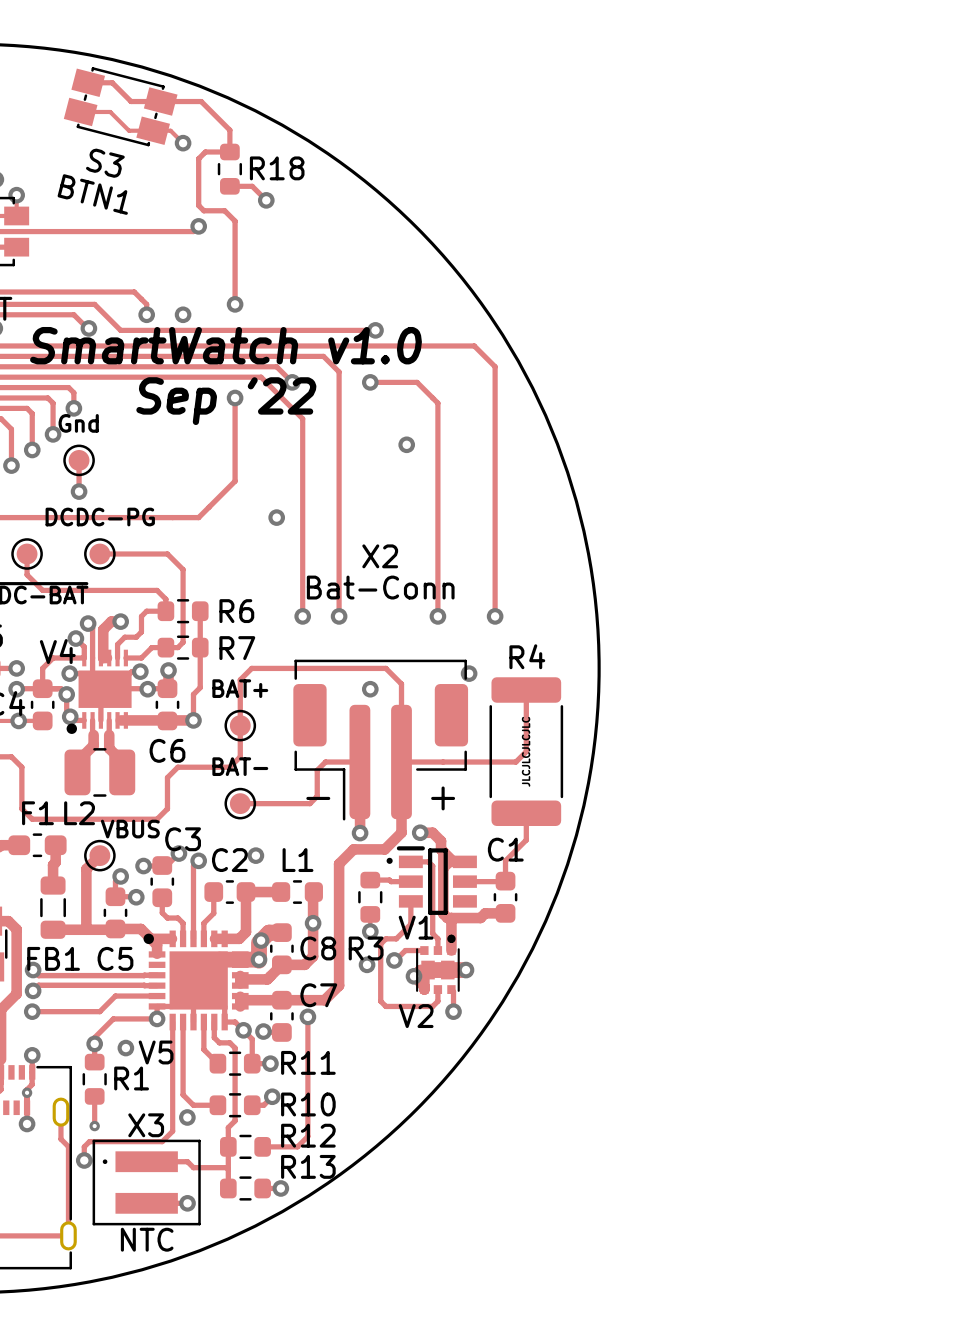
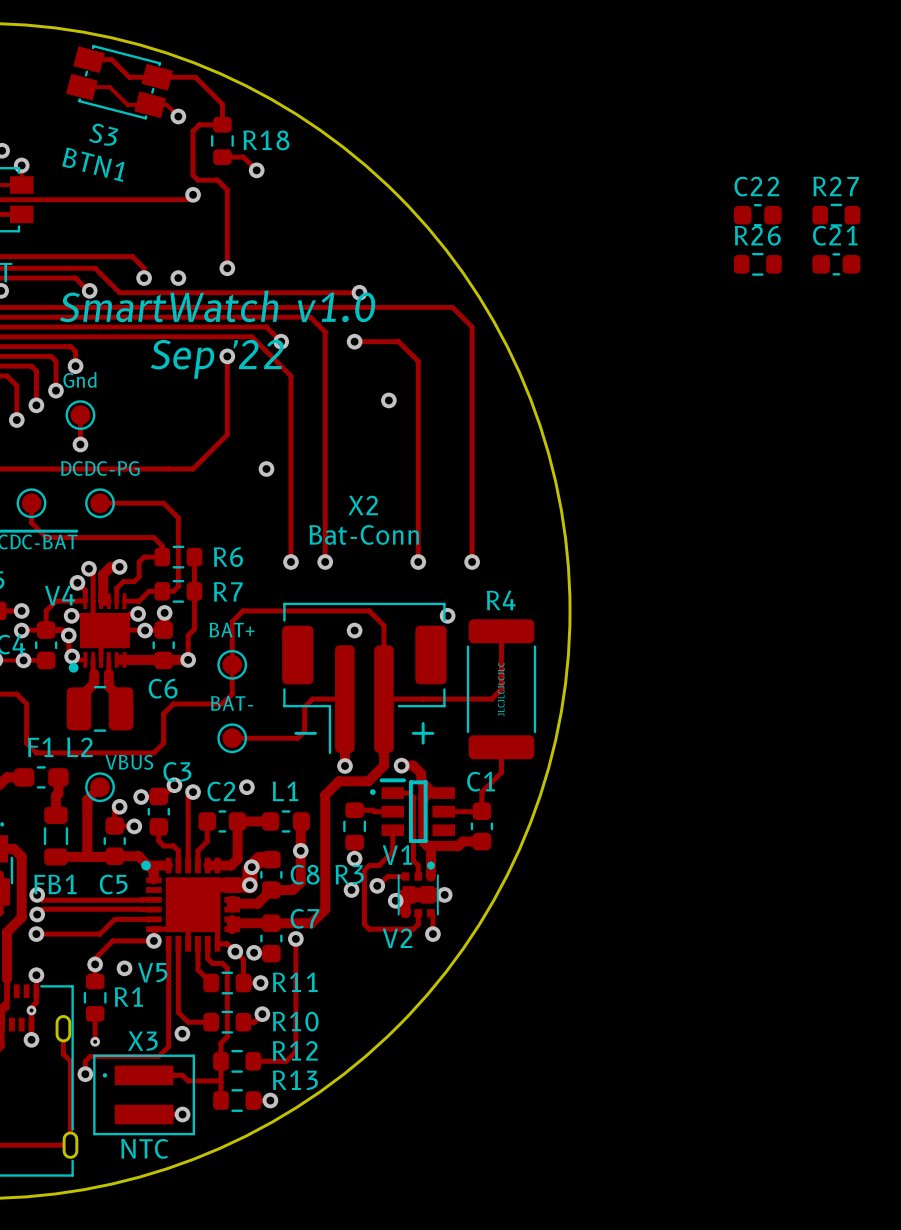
C22: none -> (757, 215)
R27: none -> (836, 215)
R26: none -> (757, 264)
C21: none -> (836, 264)

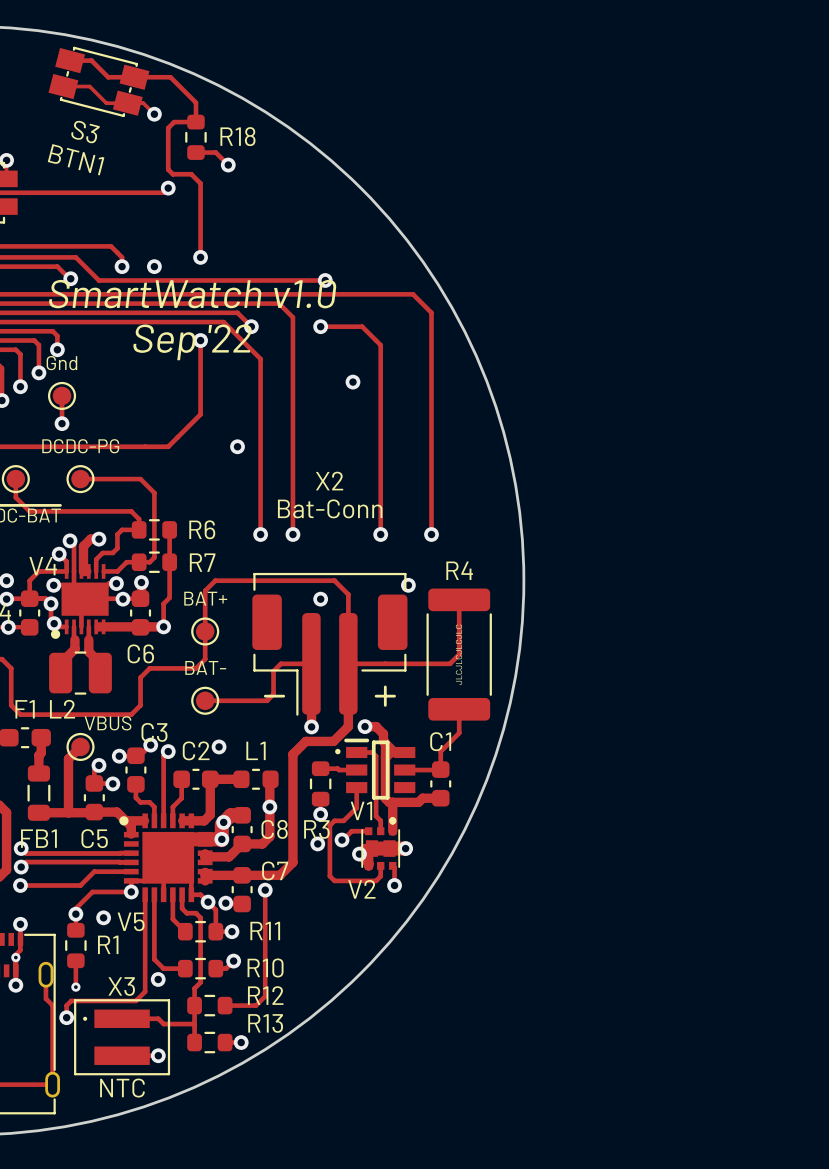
C22: (757, 215) -> none
R27: (836, 215) -> none
R26: (757, 264) -> none
C21: (836, 264) -> none

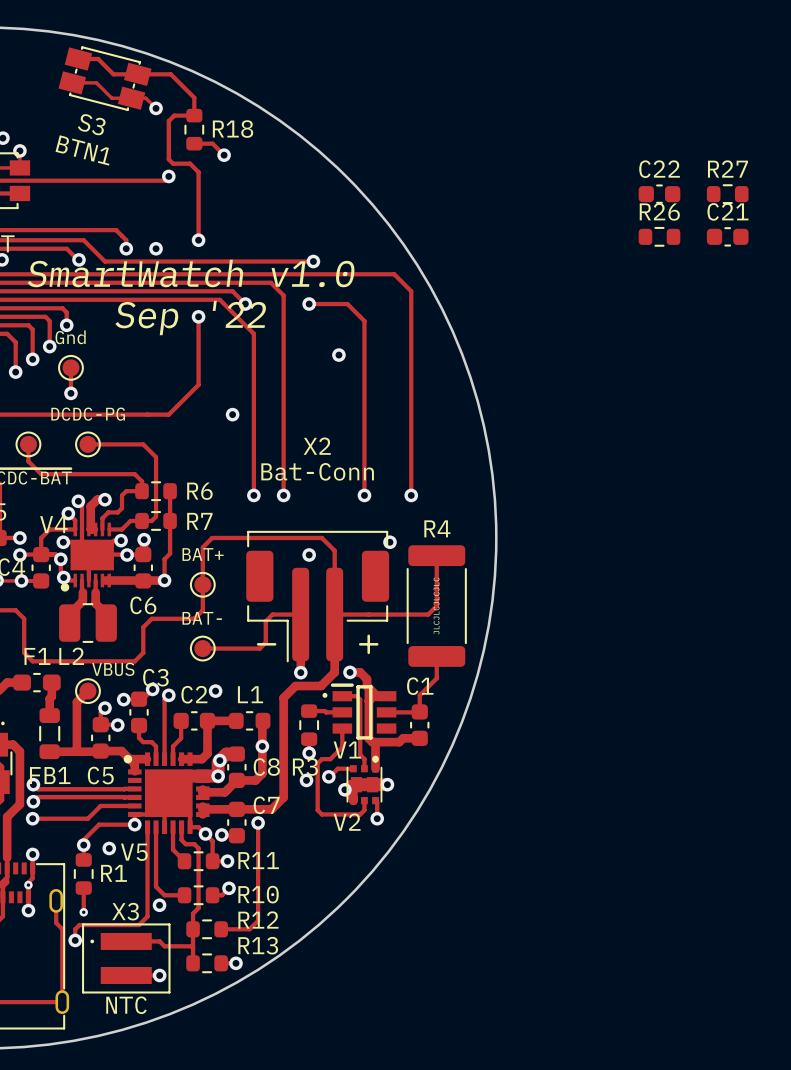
C22: none -> (659, 194)
R27: none -> (727, 194)
R26: none -> (659, 236)
C21: none -> (727, 236)

